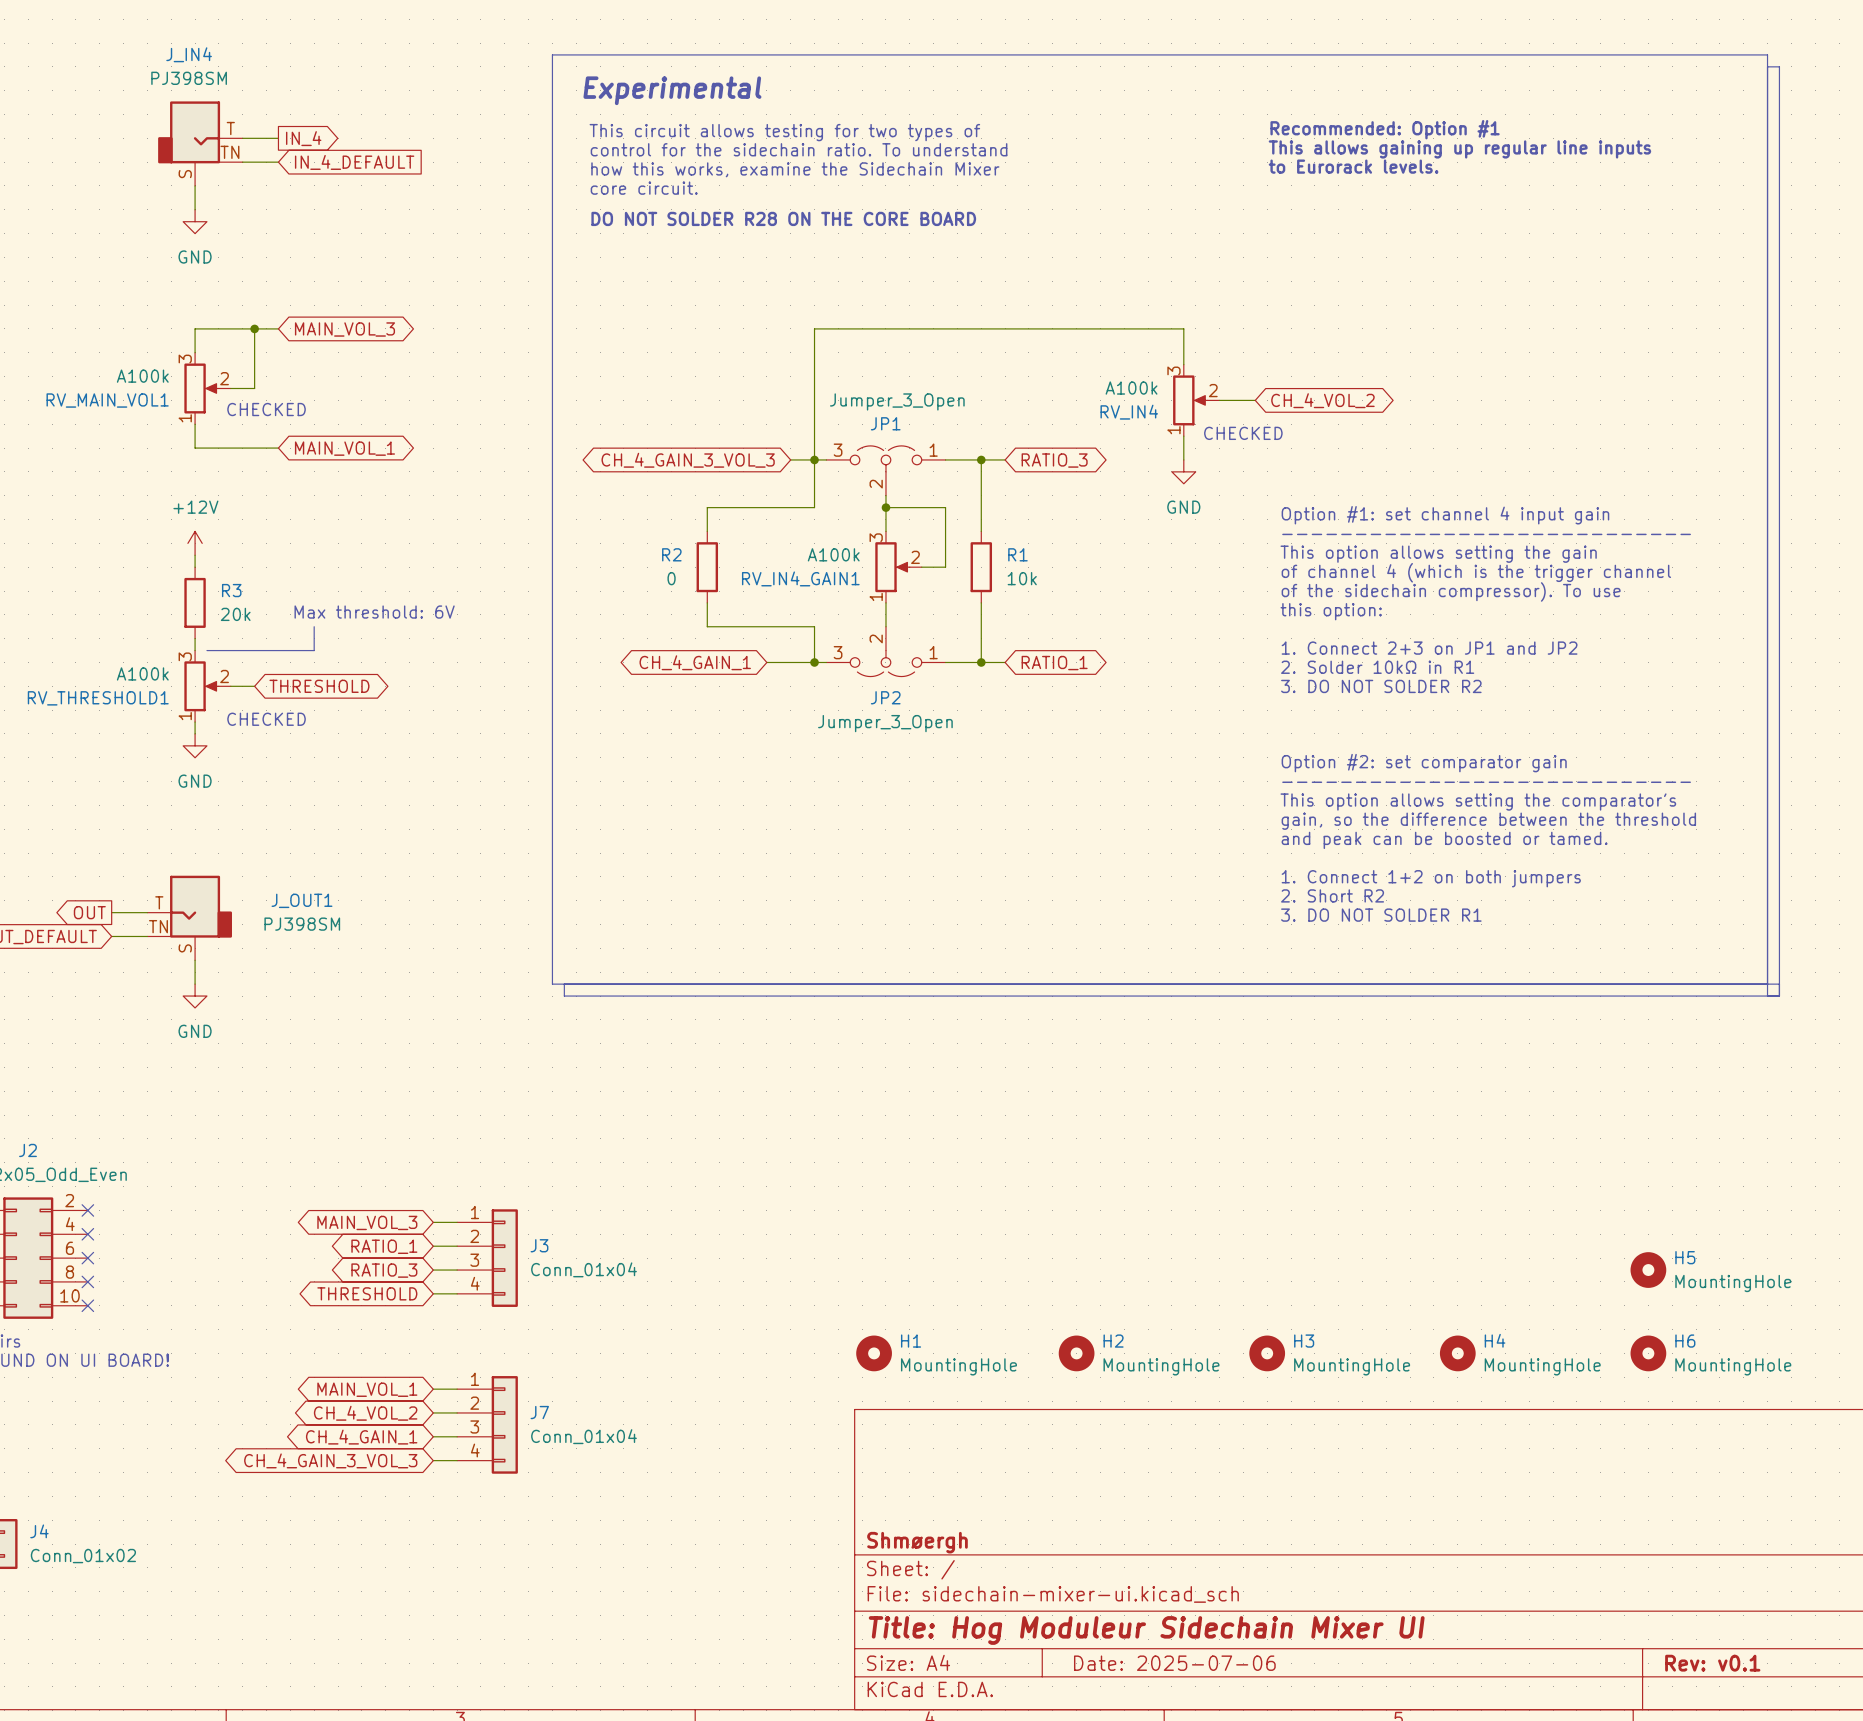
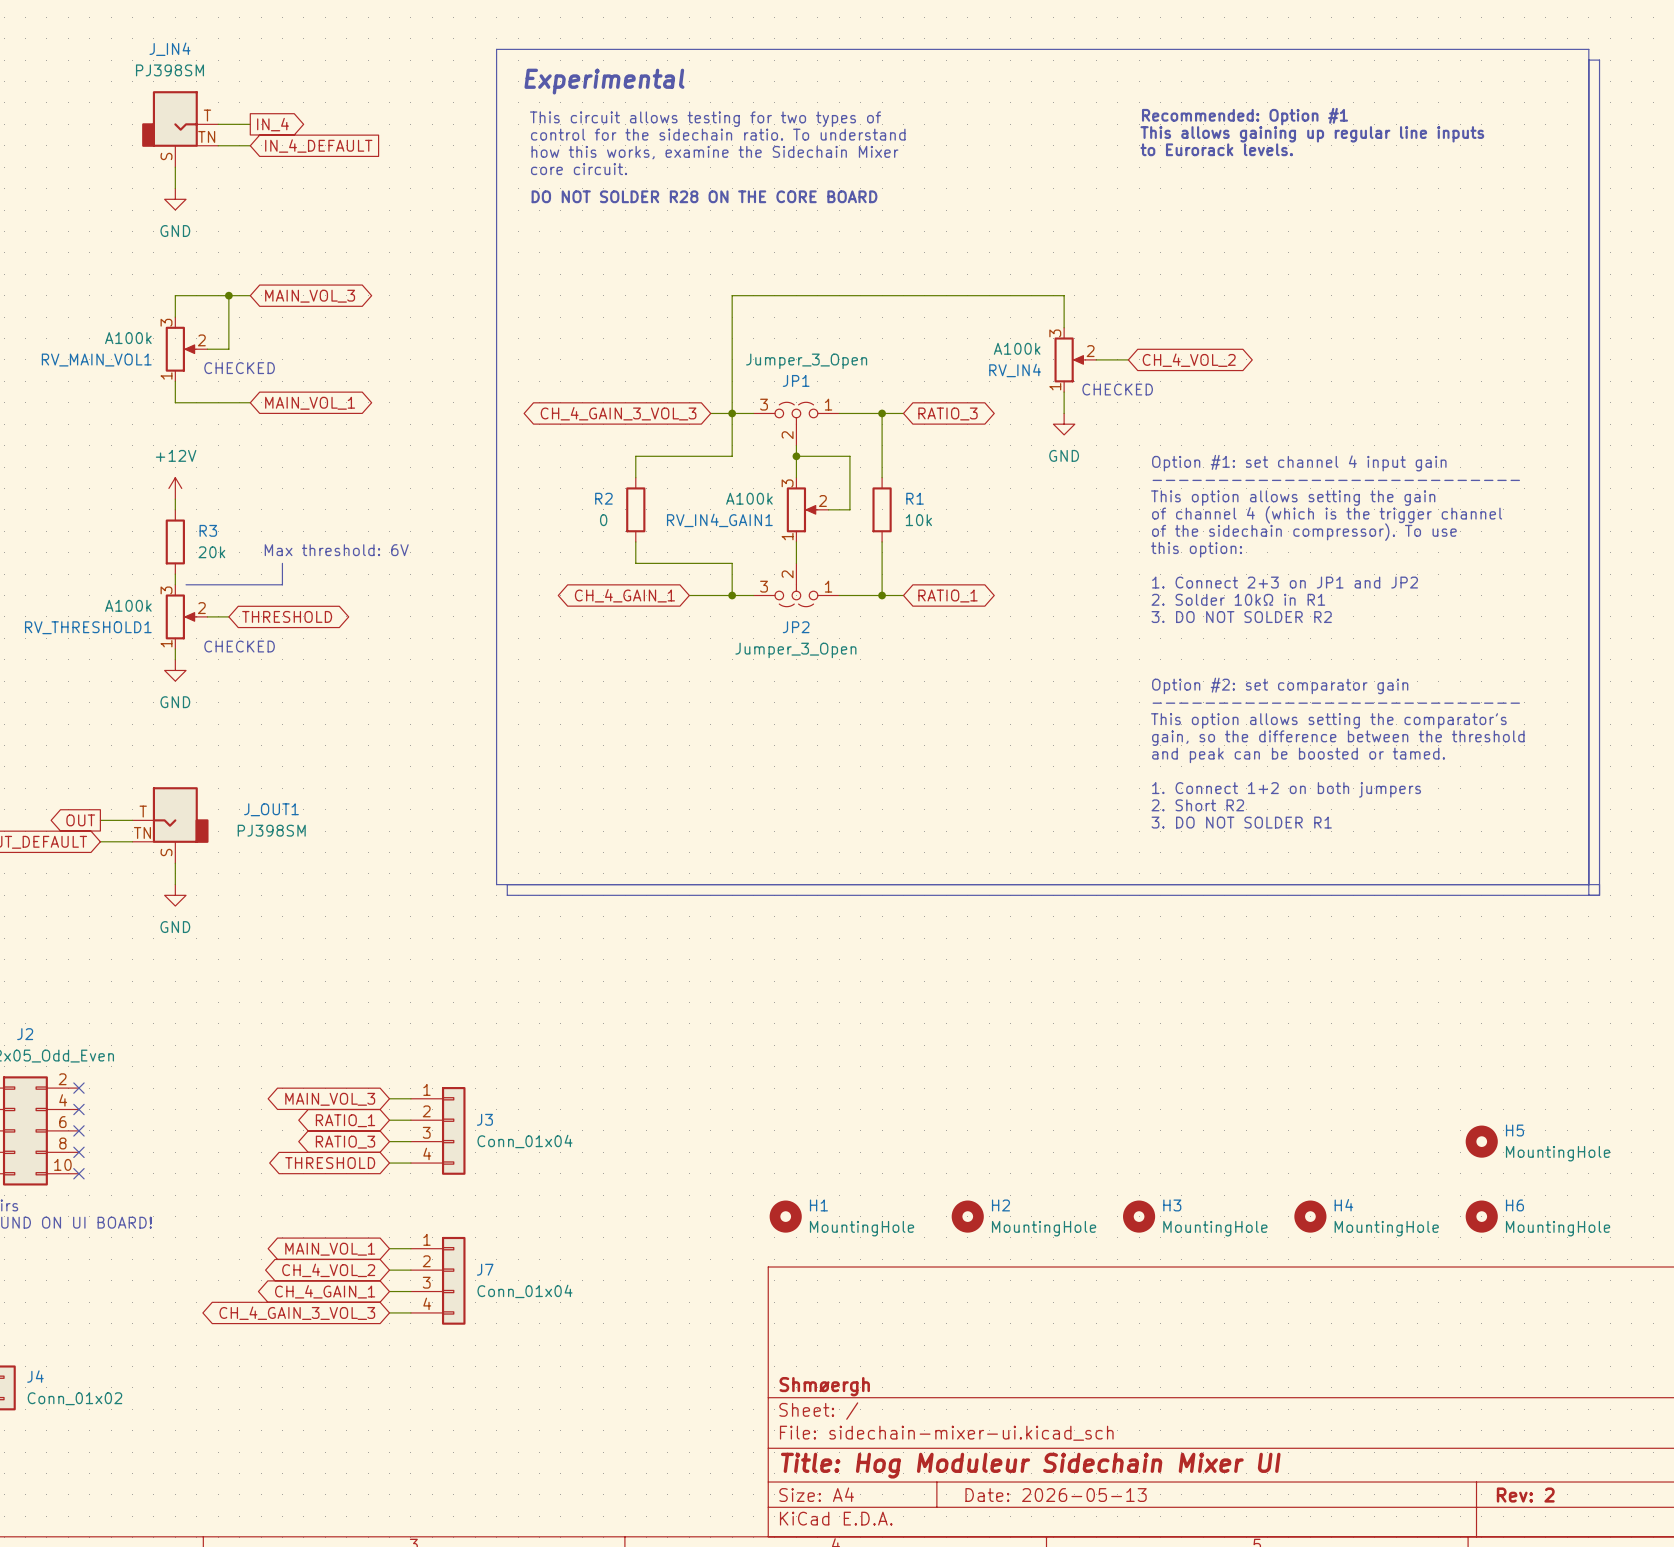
JP1 symbol: [826, 445, 946, 496] -> [753, 402, 840, 446]
JP2 symbol: [826, 626, 946, 677] -> [753, 563, 840, 607]
title block: Date: 2025-07-06 (1174, 1663) -> Date: 2026-05-13 (1056, 1495)
title block: Rev: v0.1 (1712, 1663) -> Rev: 2 (1525, 1495)

